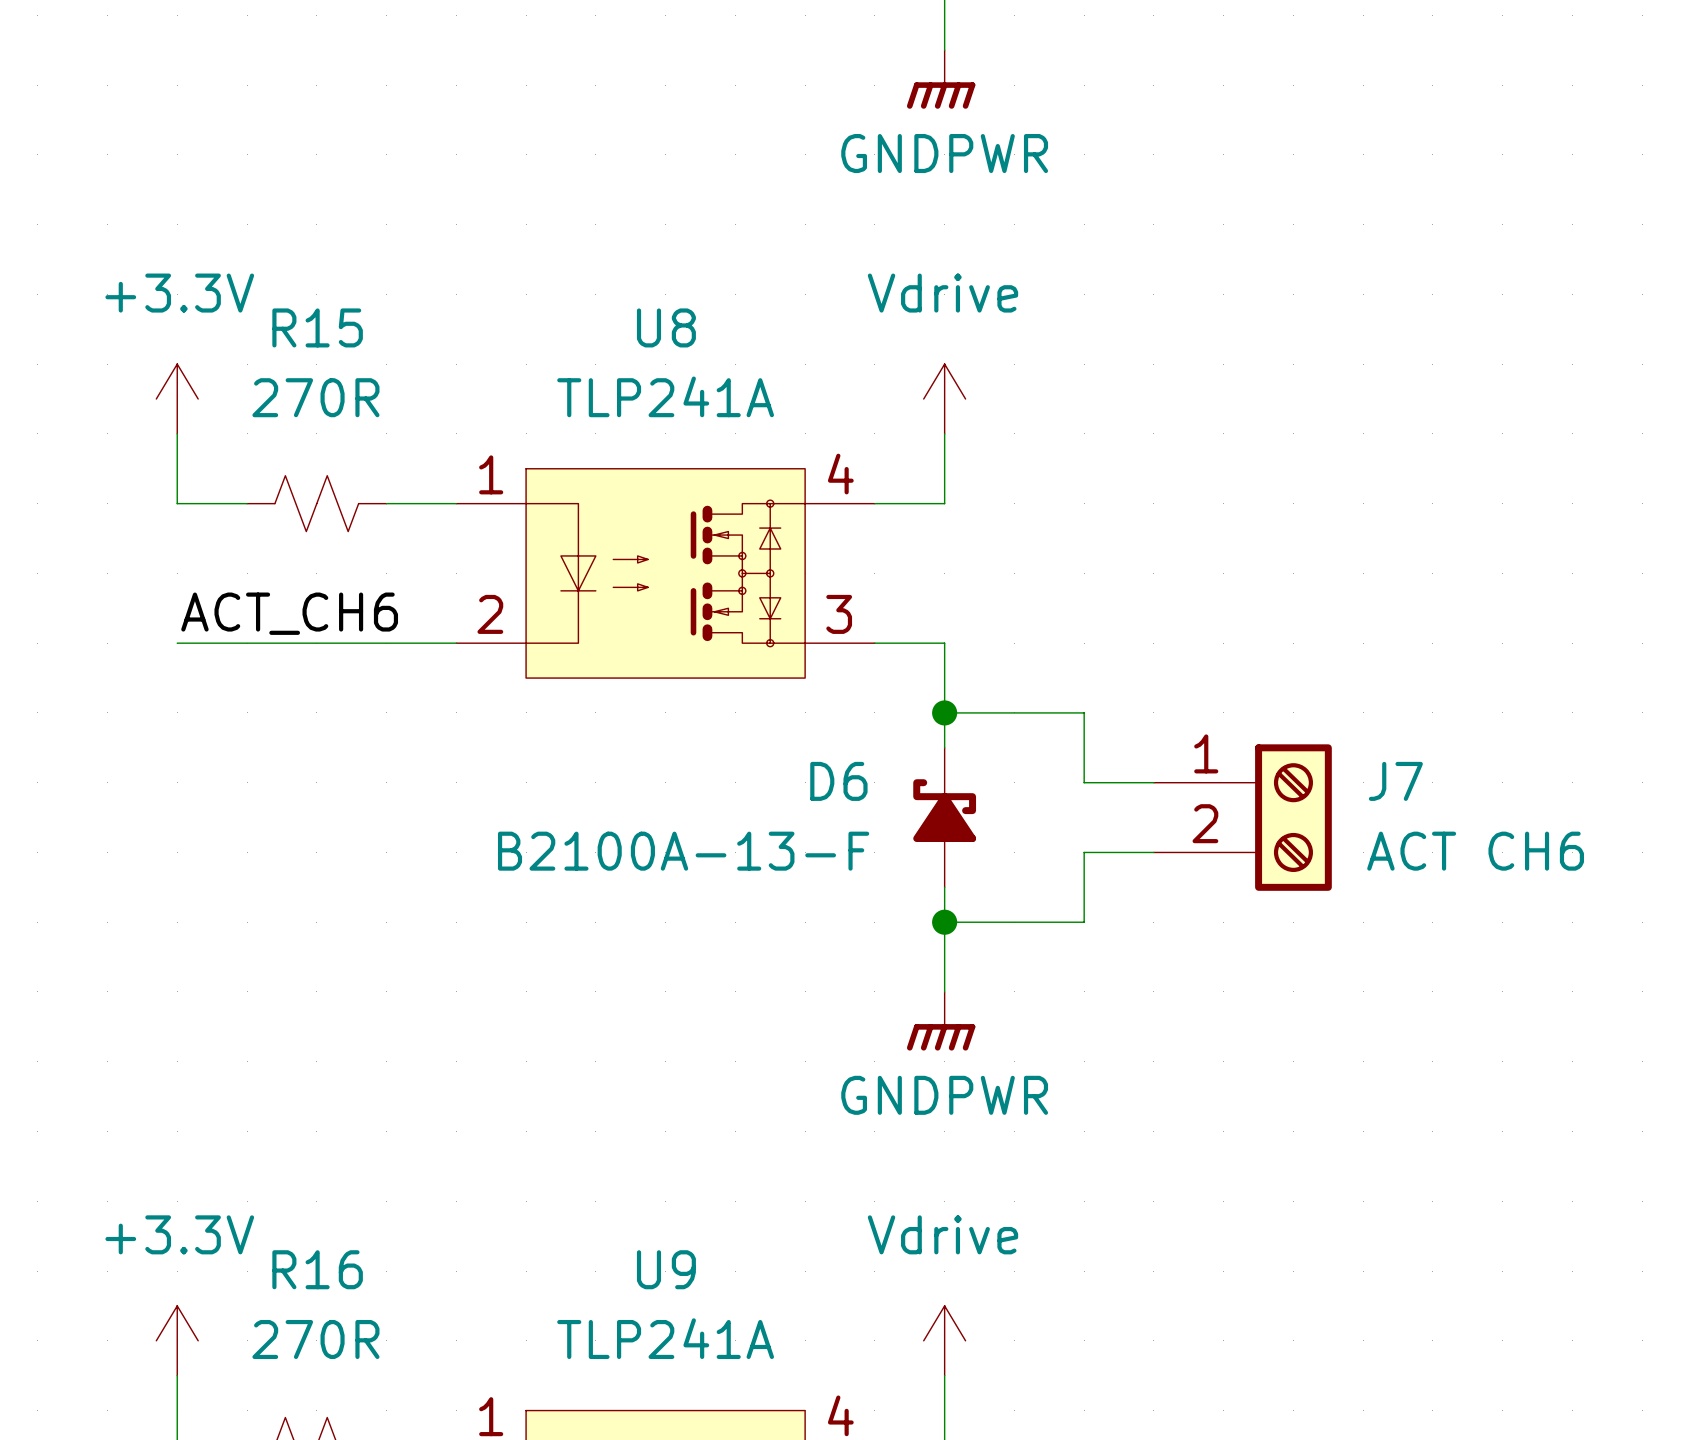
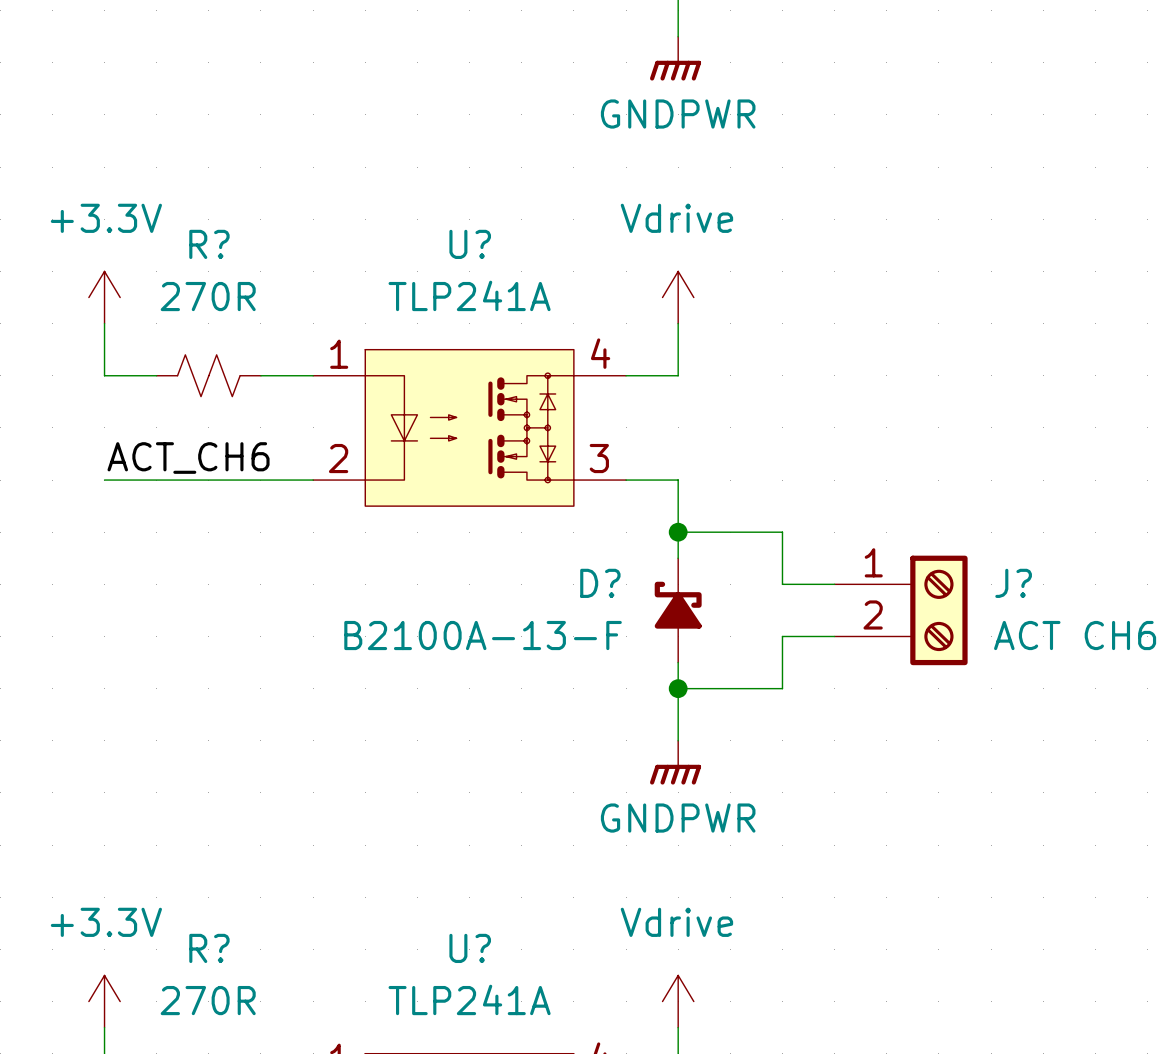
R15 name: R15 (317, 327) -> R? (209, 244)
U8 name: U8 (666, 327) -> U? (470, 244)
D6 name: D6 (838, 781) -> D? (600, 583)
J7 name: J7 (1395, 781) -> J? (1013, 583)
R16 name: R16 (317, 1269) -> R? (209, 948)
U9 name: U9 (666, 1269) -> U? (470, 948)

